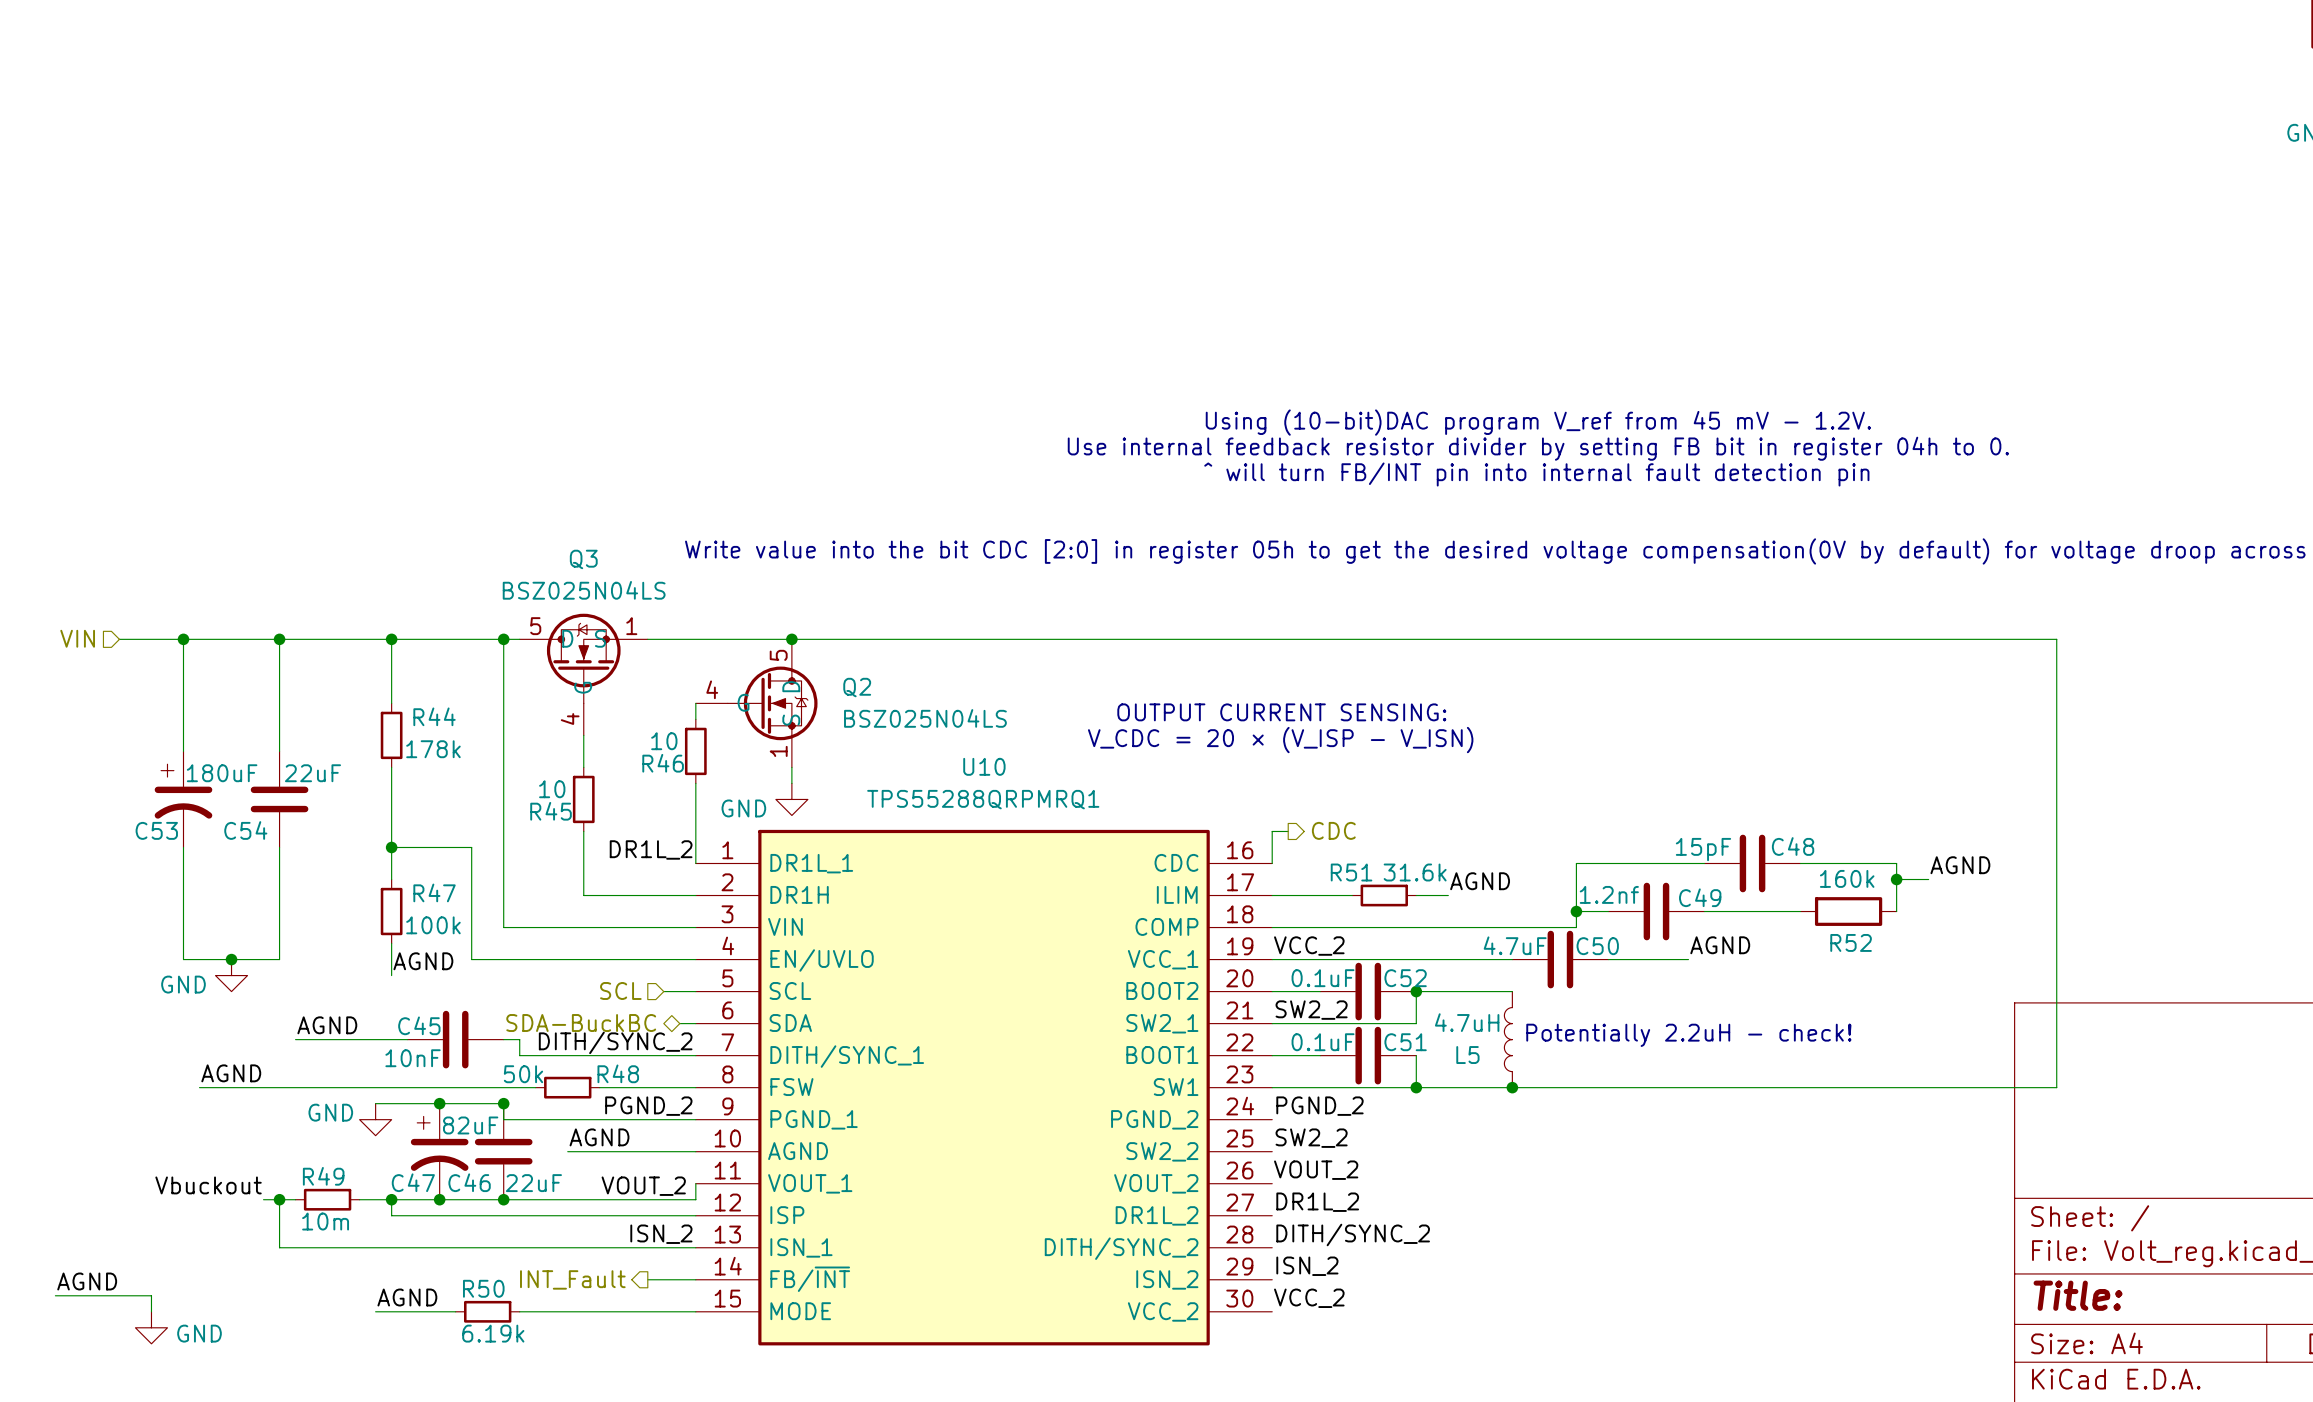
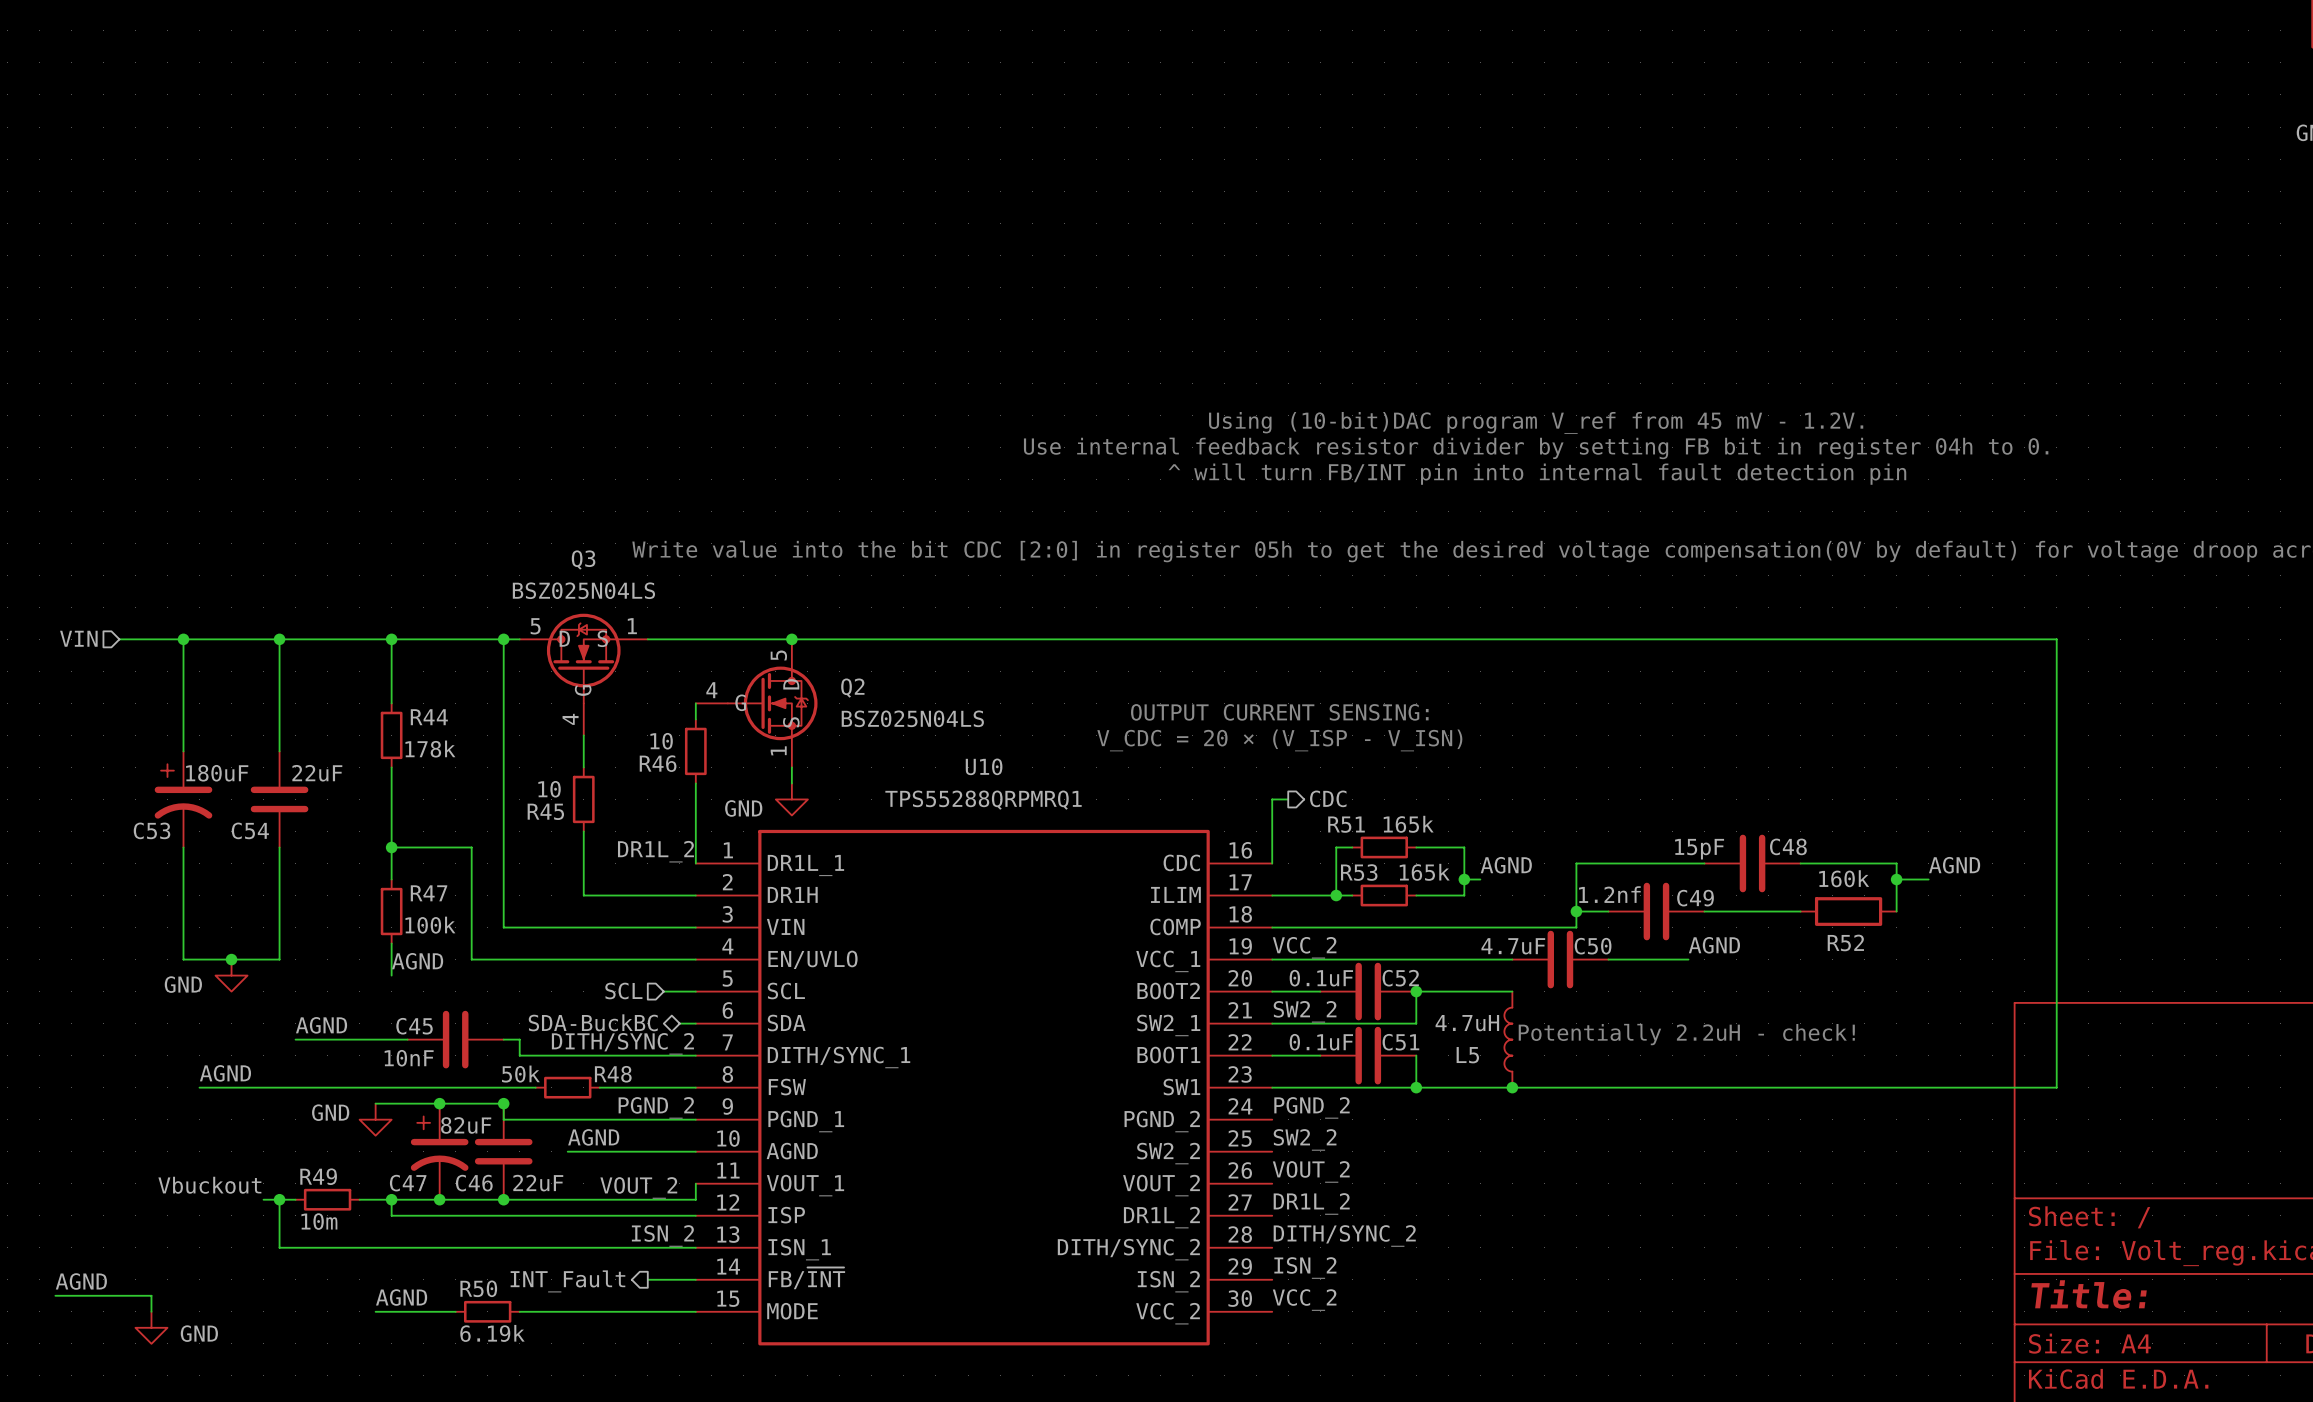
hierarchical label position: CDC (1333, 830) -> CDC (1328, 798)
wire: (1272, 831) (1288, 831) -> (1272, 831) (1272, 799) (1288, 799)
wire: none -> (1352, 847) (1336, 847) (1336, 895)
R51: none -> 165k (1384, 847)
wire: none -> (1416, 847) (1464, 847) (1464, 895) (1448, 895)
R51 name: R51 (1351, 872) -> R53 (1359, 872)
R51 value: 31.6k (1415, 872) -> 165k (1424, 872)
wire: none -> (1464, 879) (1480, 879)
junction: none -> (1464, 879)
label position: AGND (1480, 881) -> AGND (1506, 865)
junction: none -> (1336, 895)

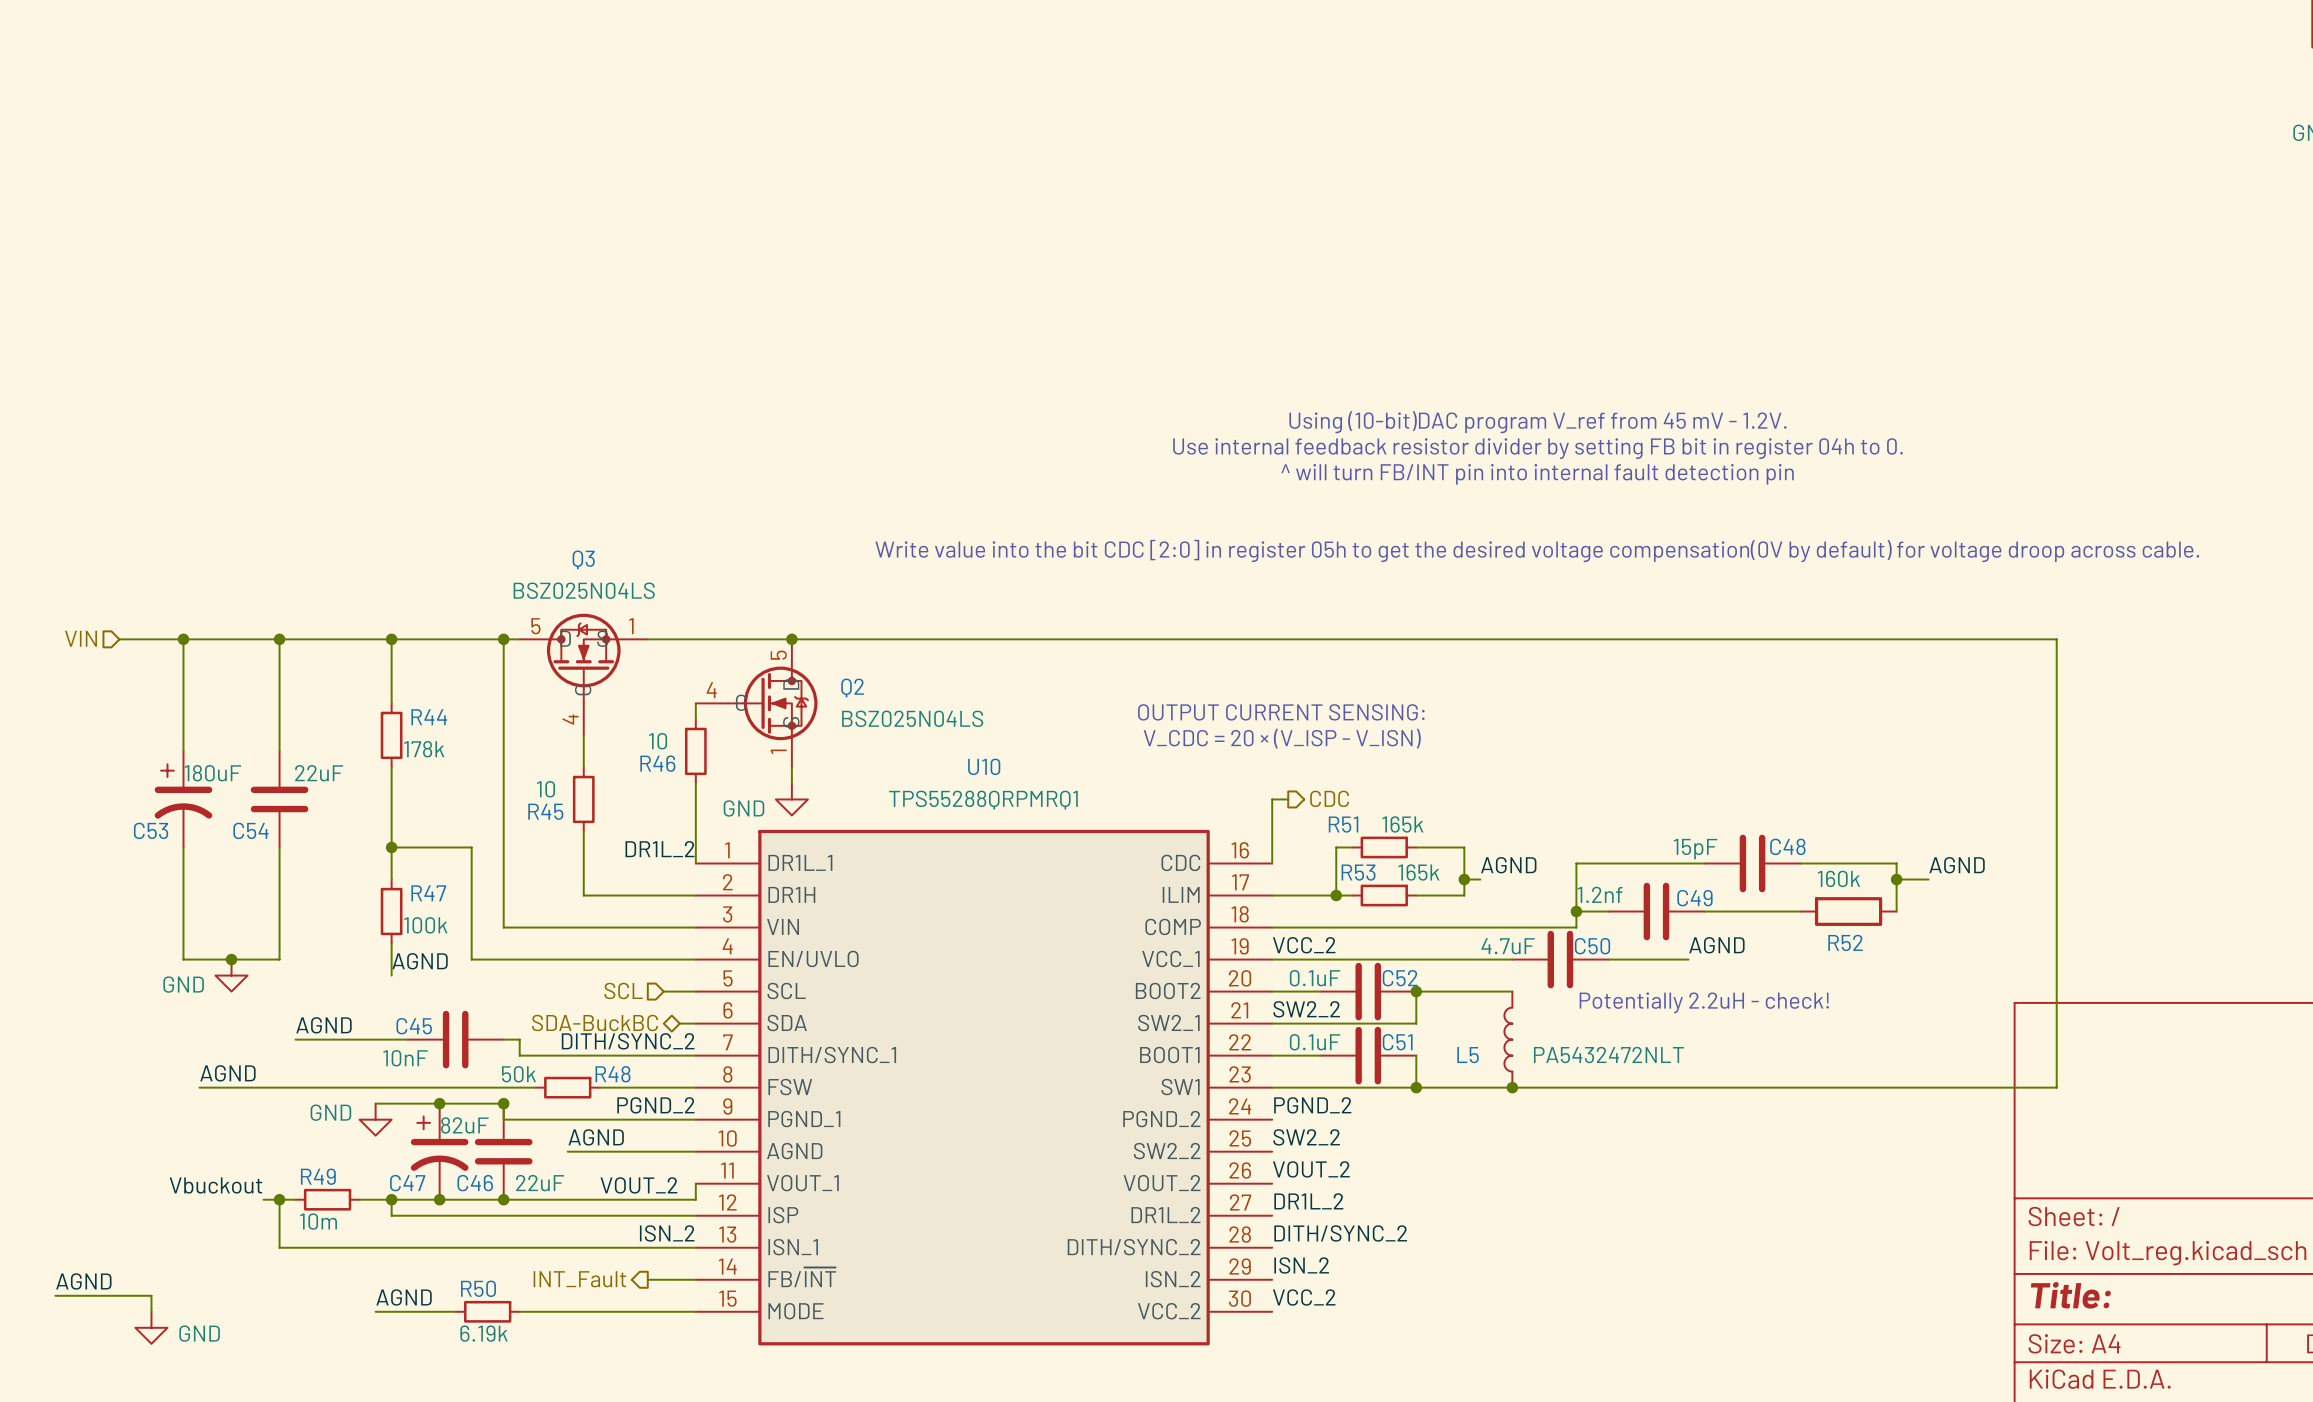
L5 value: 4.7uH (1467, 1023) -> PA5432472NLT (1608, 1055)
text position: Potentially 2.2uH - check! (1686, 1034) -> Potentially 2.2uH - check! (1704, 1002)

